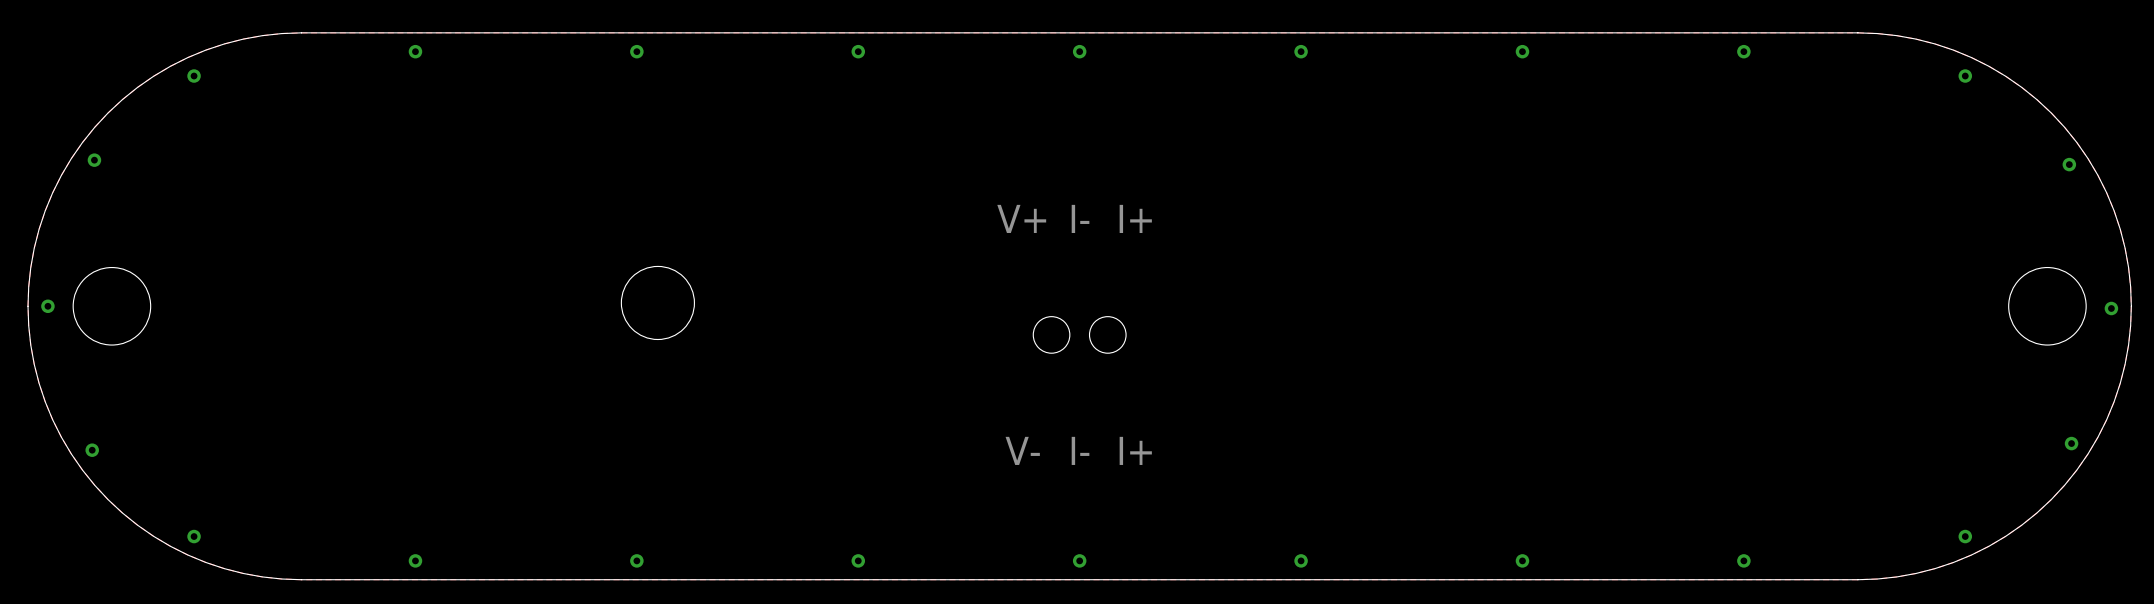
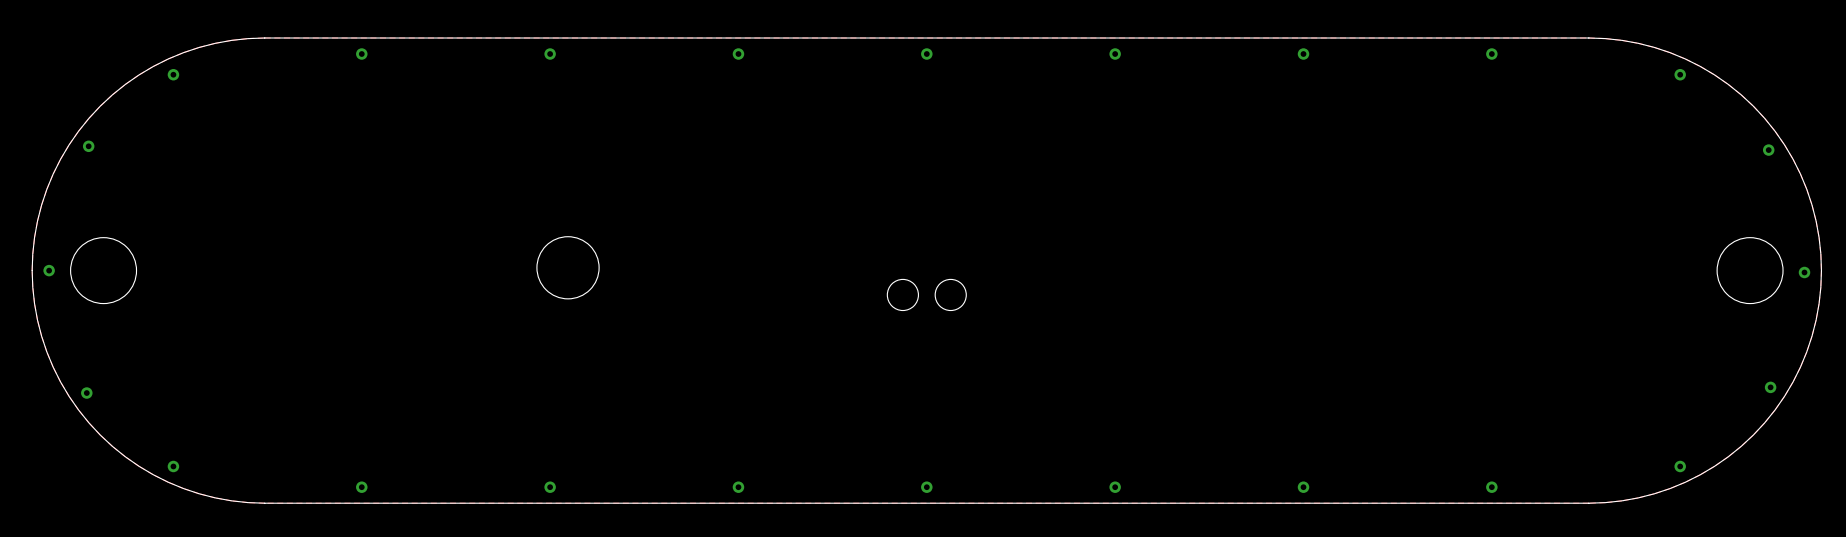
text: V+ (1021, 218) -> none
text: I- (1080, 218) -> none
text: I+ (1135, 218) -> none
text: V- (1022, 450) -> none
text: I- (1080, 450) -> none
text: I+ (1135, 450) -> none

